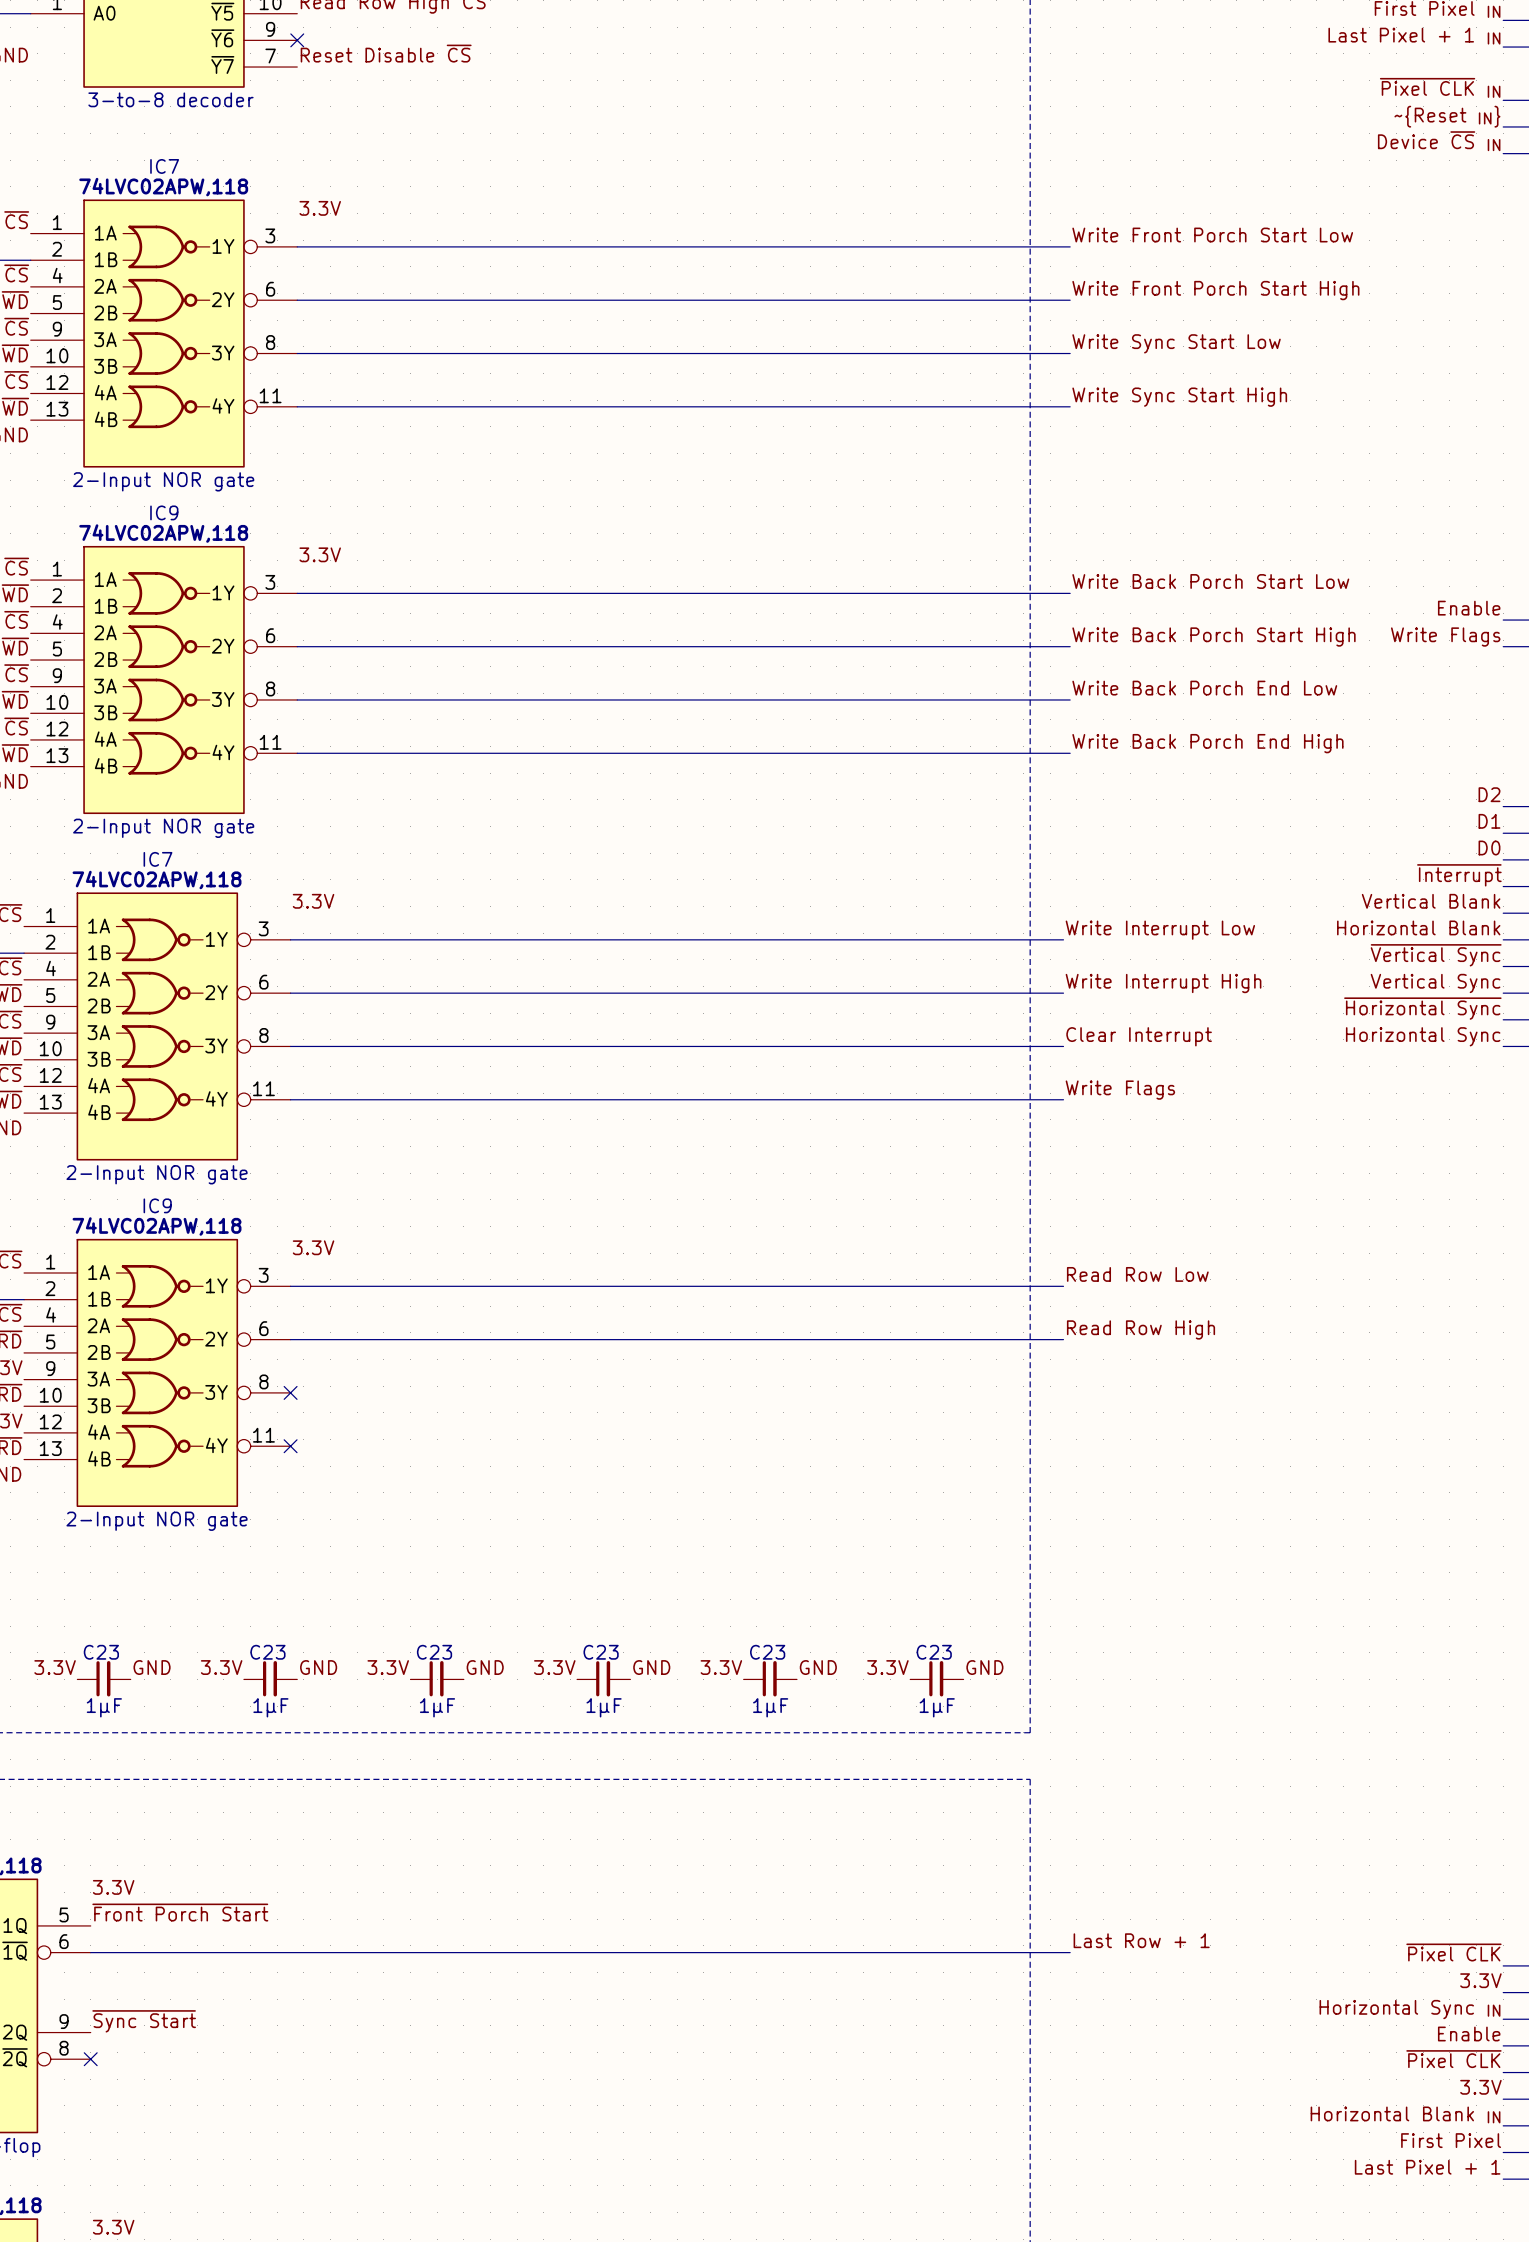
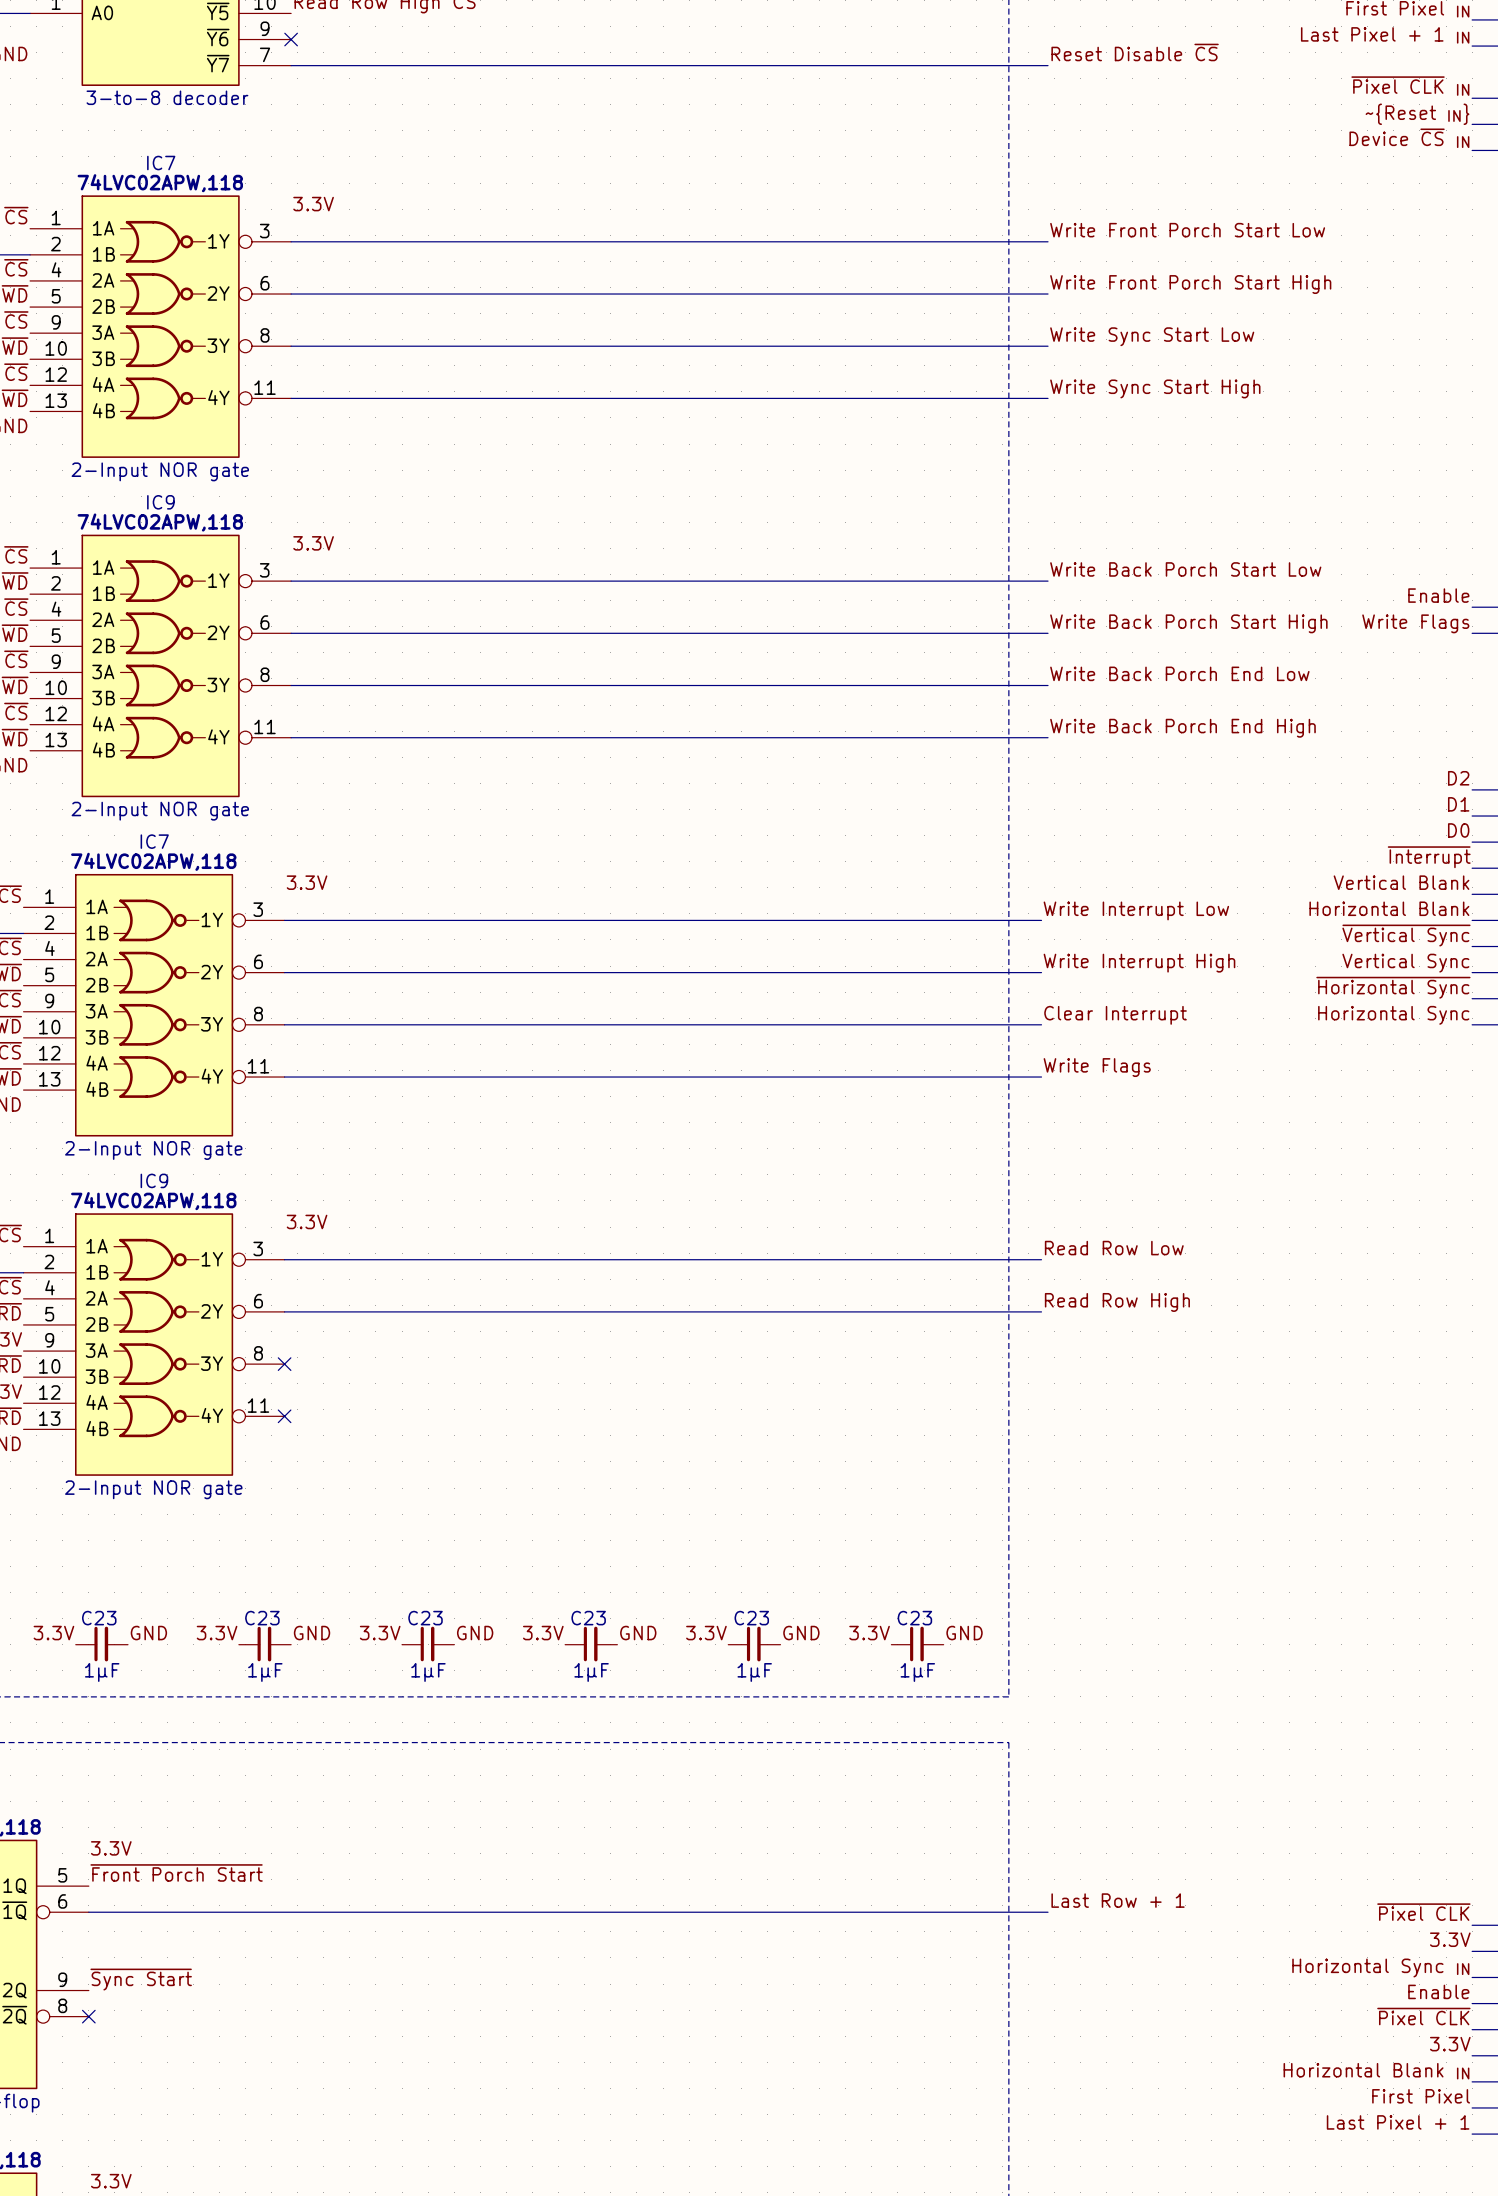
label: Reset Disable ~{CS} (386, 53) -> none
label: none -> Reset Disable ~{CS} (1135, 52)
wire: none -> (291, 65) (1048, 65)

